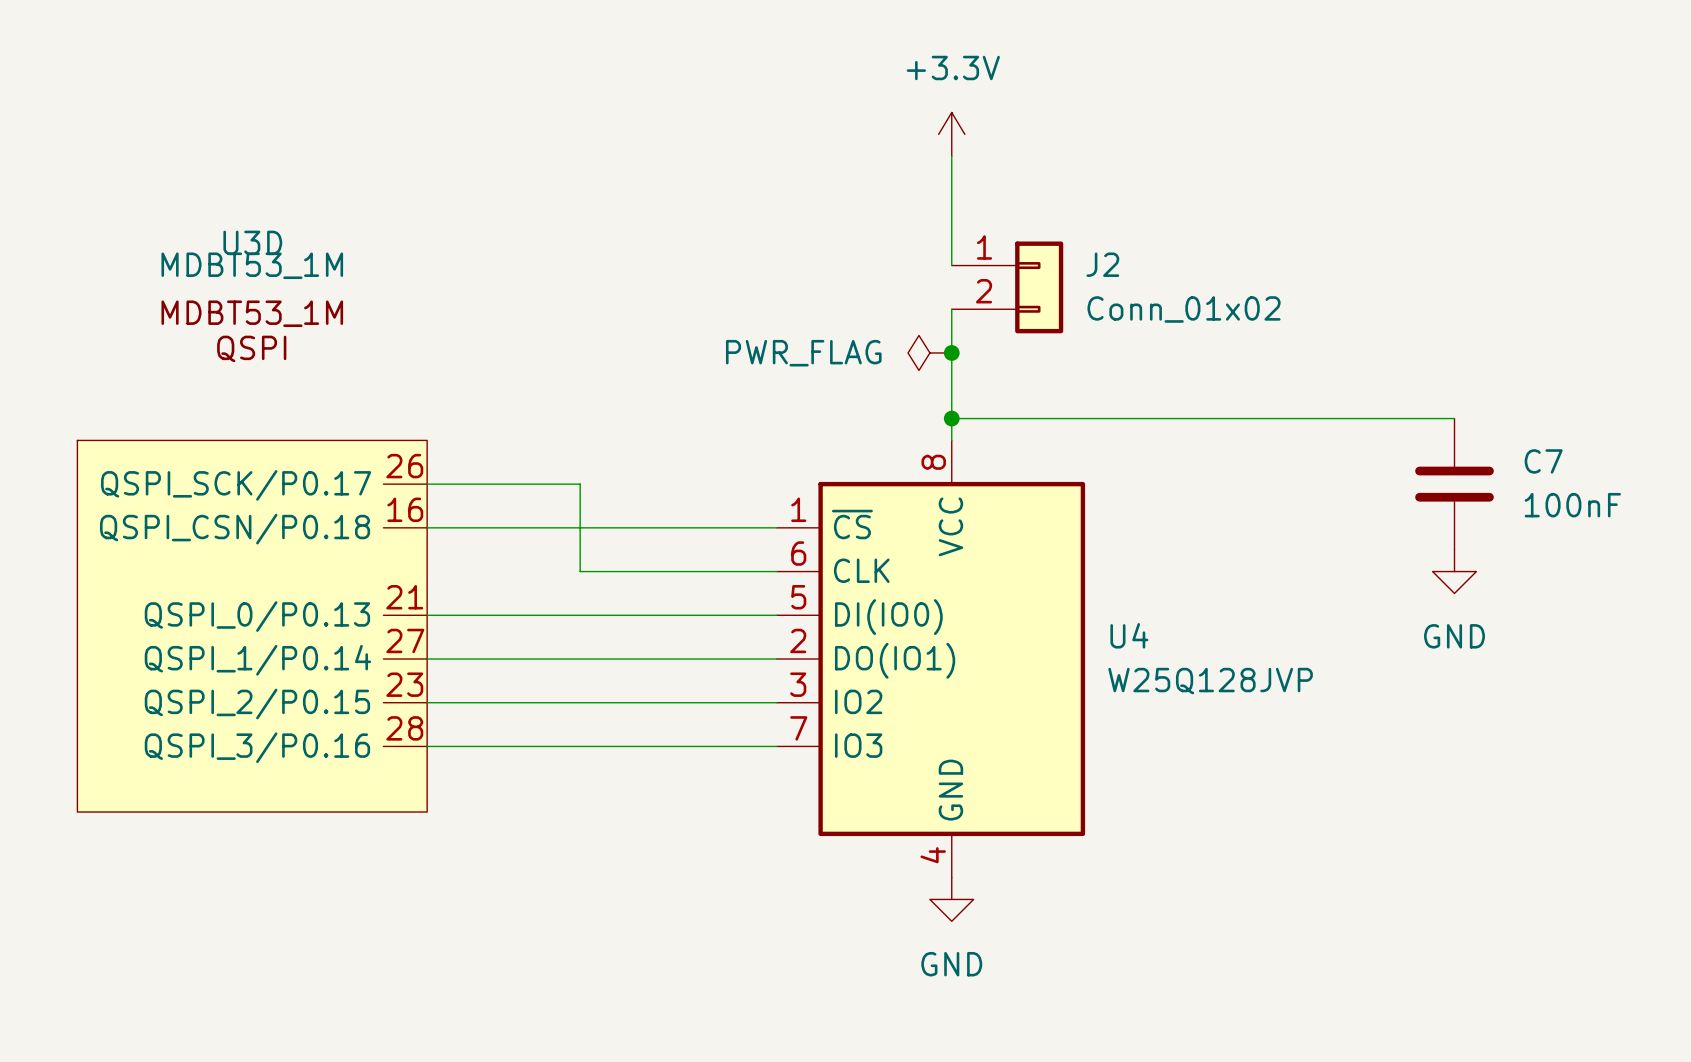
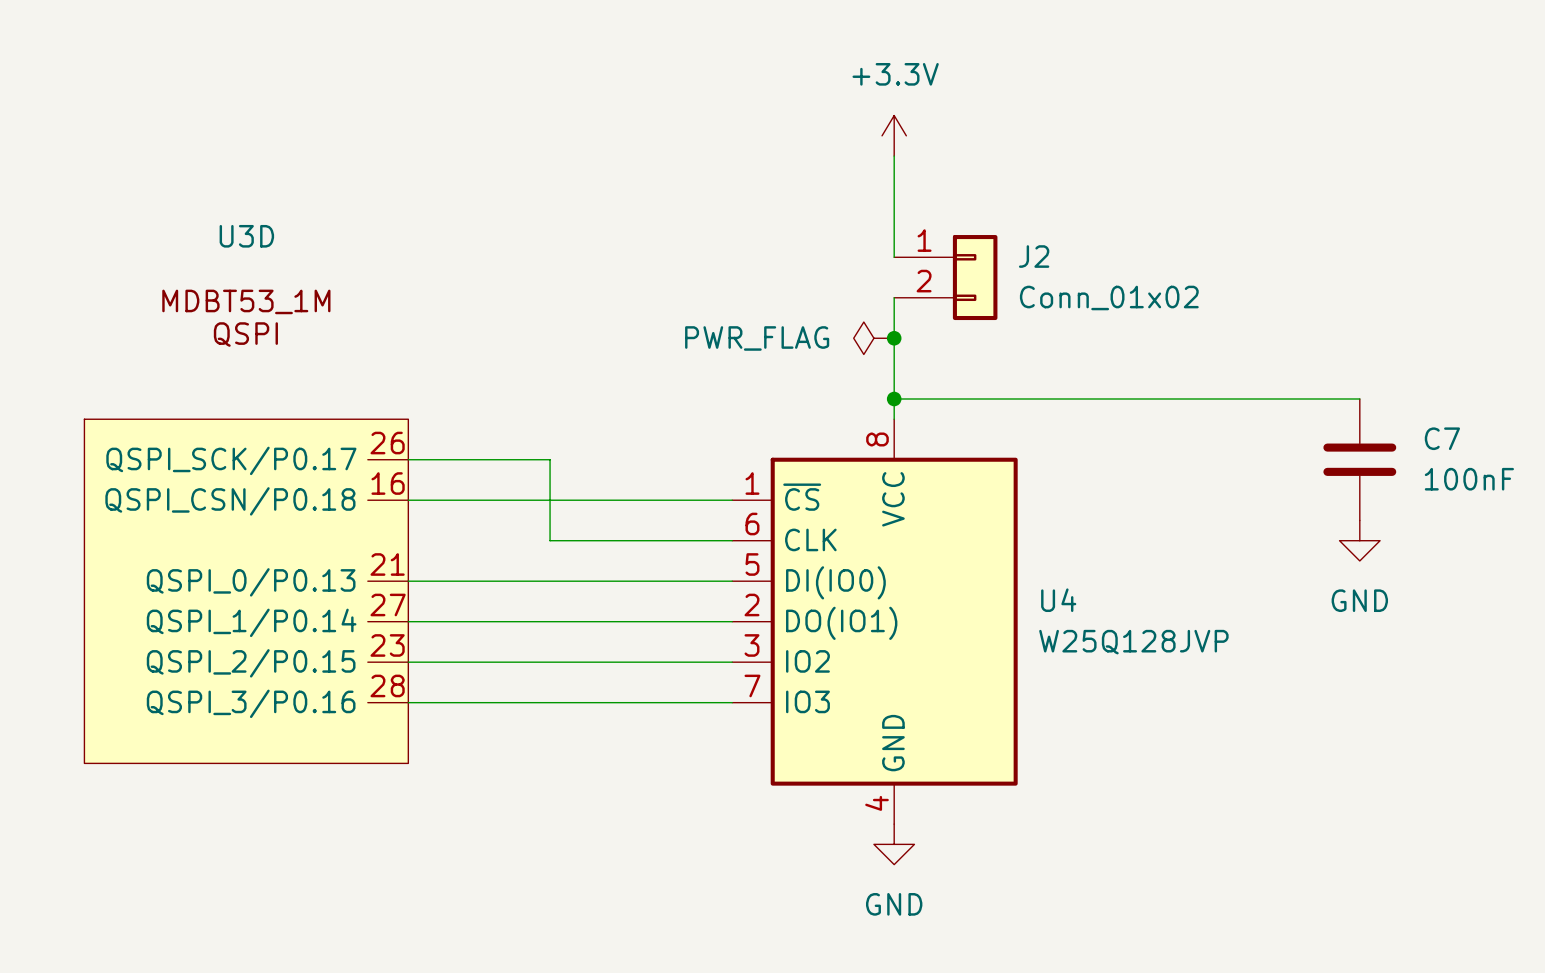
U3D value: MDBT53_1M (252, 265) -> none

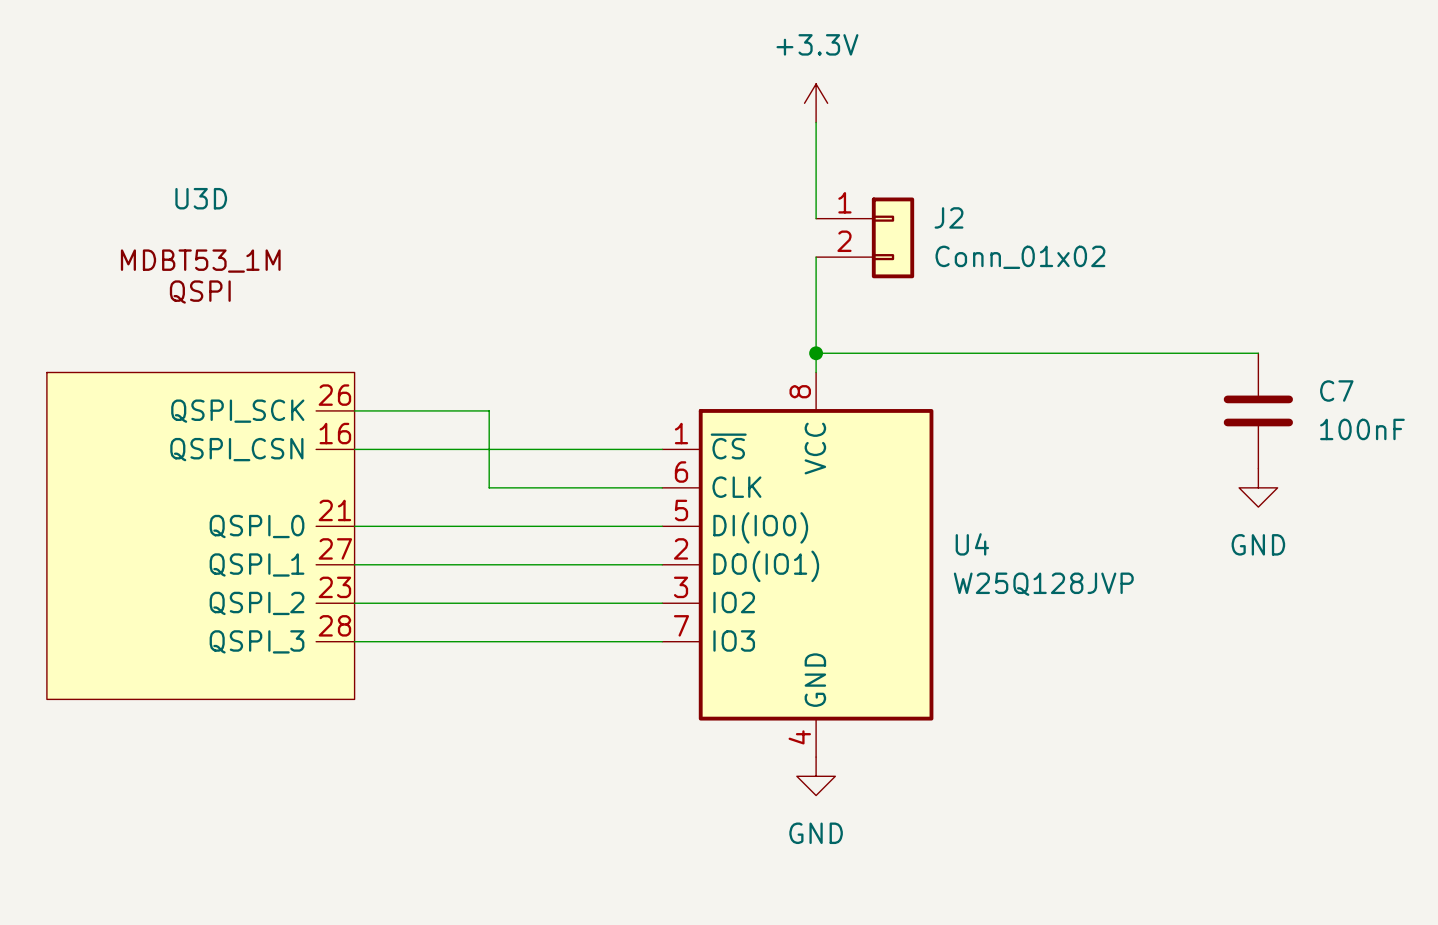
power symbol: PWR_FLAG (873, 338) -> none
junction: (894, 338) -> none
U3D pin name: QSPI_SCK/P0.17 (231, 460) -> QSPI_SCK (237, 411)
U3D pin name: QSPI_CSN/P0.18 (230, 501) -> QSPI_CSN (236, 449)
U3D pin name: QSPI_0/P0.13 (251, 582) -> QSPI_0 (257, 526)
U3D pin name: QSPI_1/P0.14 (251, 622) -> QSPI_1 (257, 564)
U3D pin name: QSPI_2/P0.15 (251, 663) -> QSPI_2 (257, 603)
U3D pin name: QSPI_3/P0.16 (251, 703) -> QSPI_3 (257, 641)

